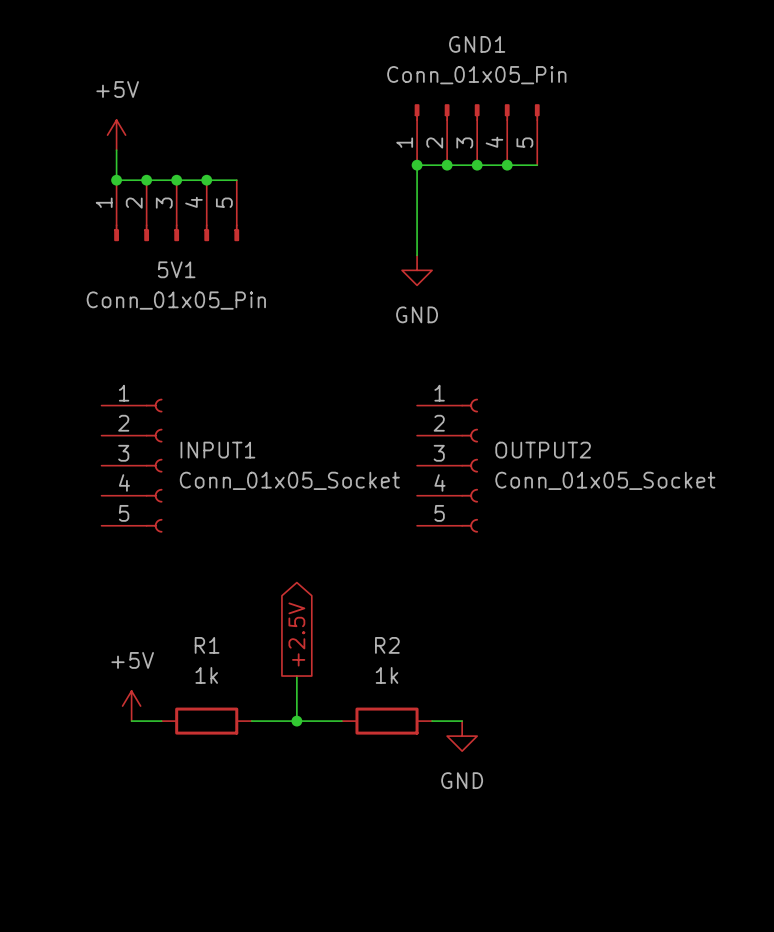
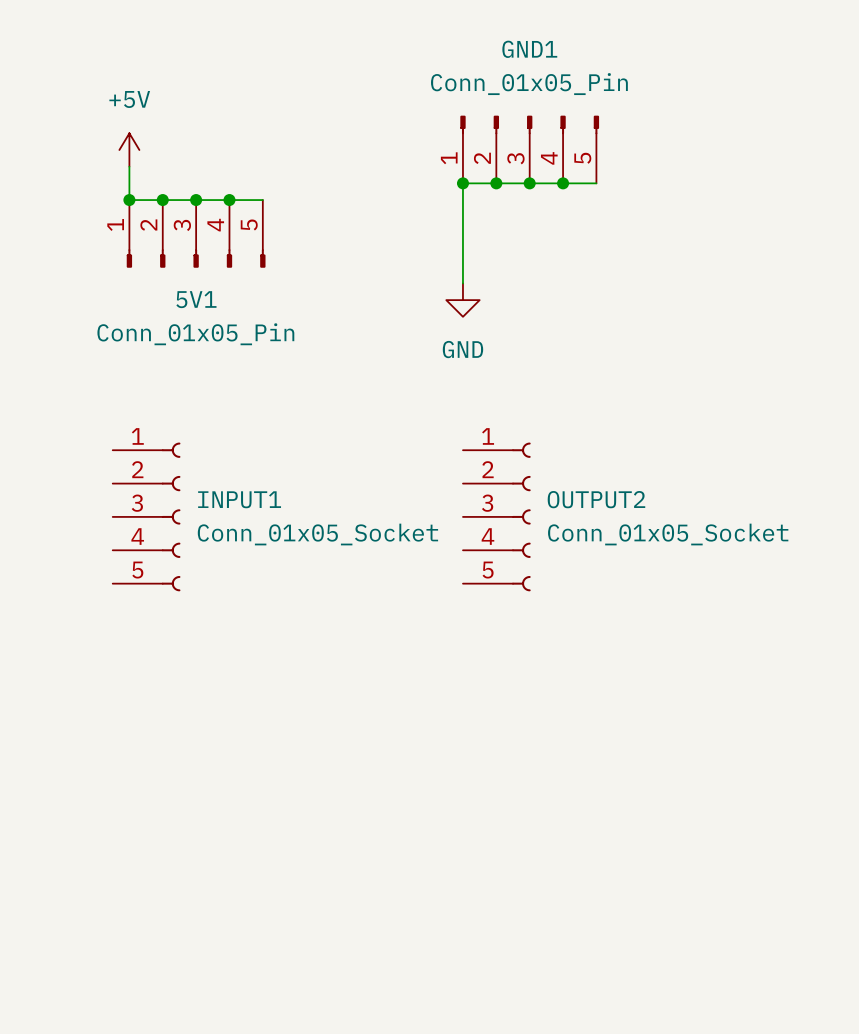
global label: +2.5V (296, 634) -> none
wire: (296, 676) (296, 721) -> none
power symbol: +5V (131, 706) -> none
wire: (131, 721) (161, 721) -> none
R1: 1k (206, 721) -> none
wire: (251, 721) (341, 721) -> none
junction: (296, 721) -> none
R2: 1k (387, 721) -> none
wire: (432, 721) (462, 721) -> none
power symbol: GND (462, 736) -> none

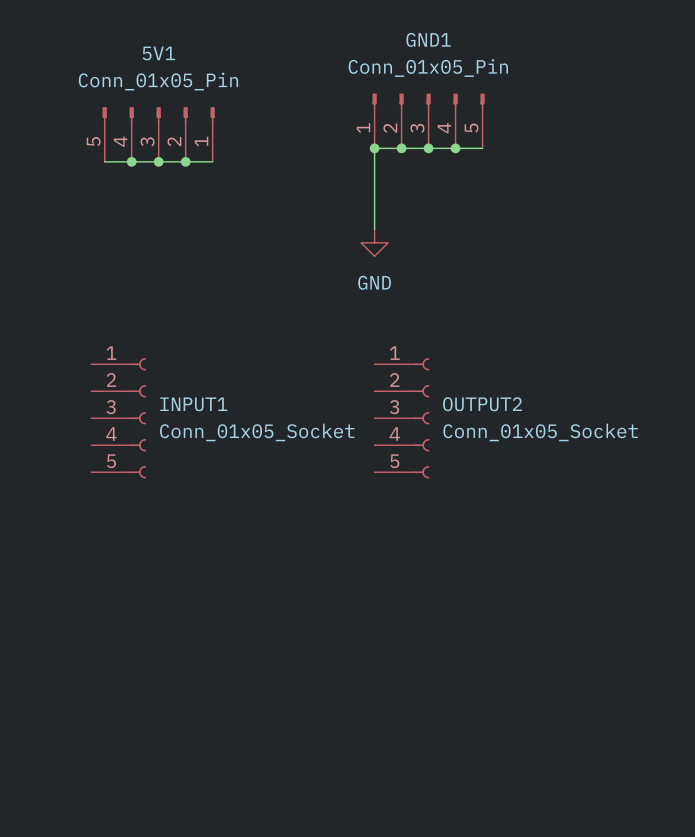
power symbol: +5V (129, 150) -> none
junction: (129, 200) -> none
5V1 rotation: 0° (196, 258) -> 180° (158, 114)
5V1 name position: 5V1 (196, 299) -> 5V1 (158, 53)
5V1 value position: Conn_01x05_Pin (195, 334) -> Conn_01x05_Pin (158, 81)

